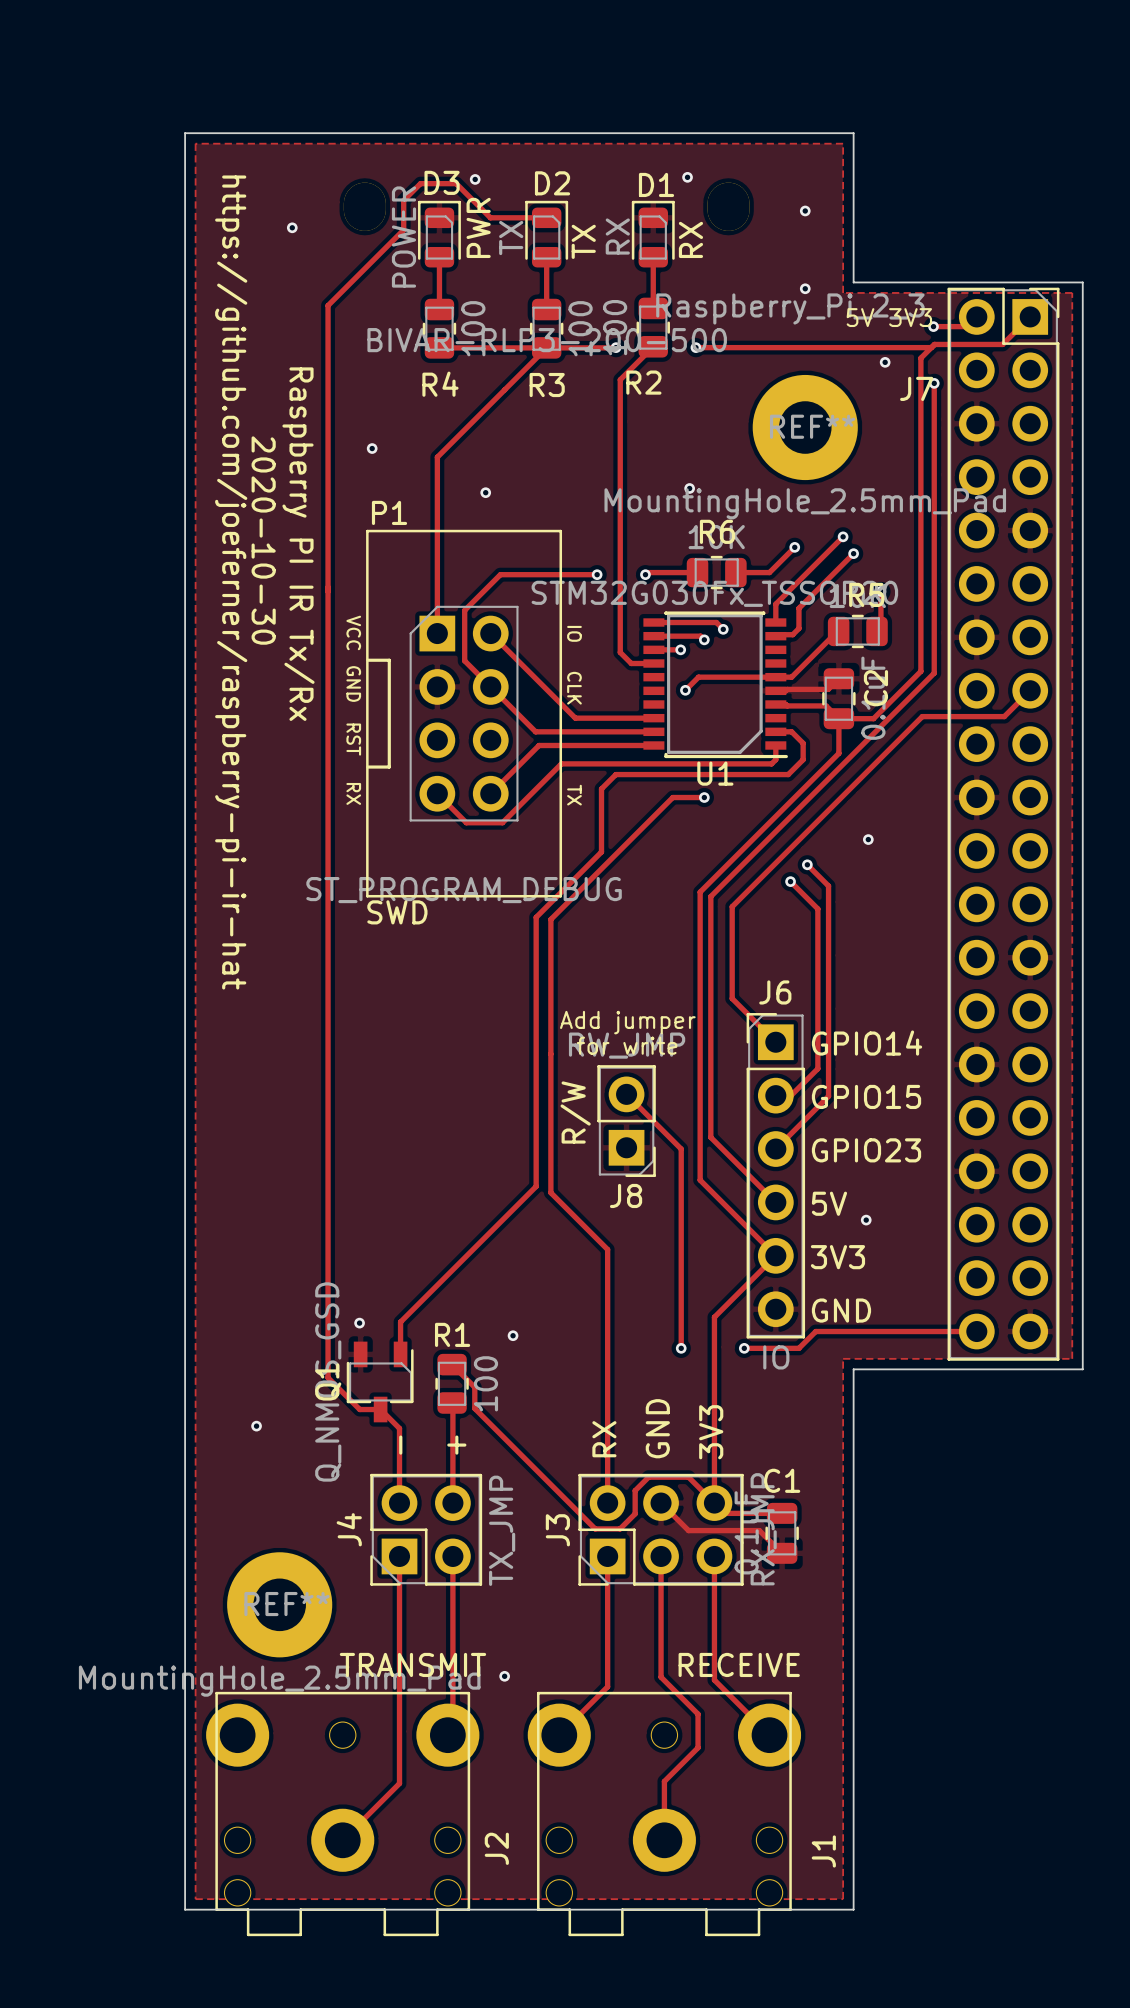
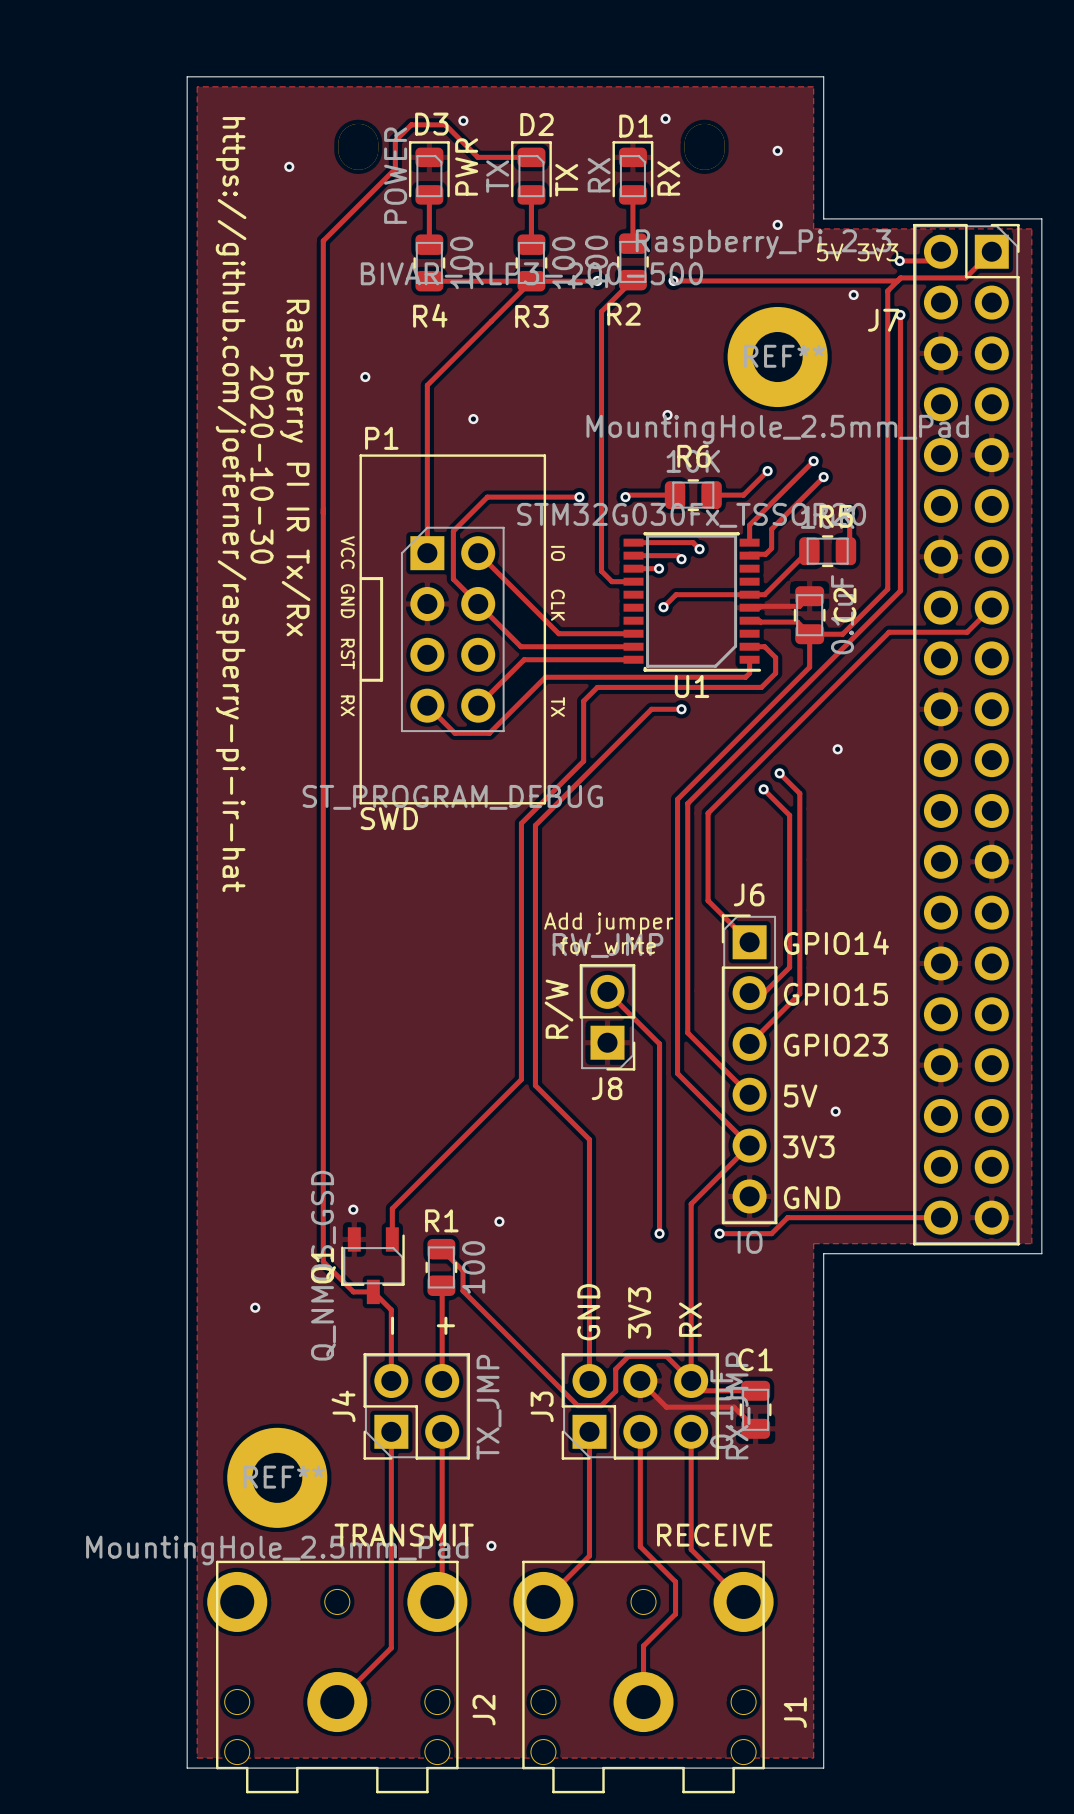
text position: GND (657, 1428) -> GND (588, 1312)
text position: 3V3 (711, 1432) -> 3V3 (639, 1312)
text position: RX (604, 1439) -> RX (690, 1319)

